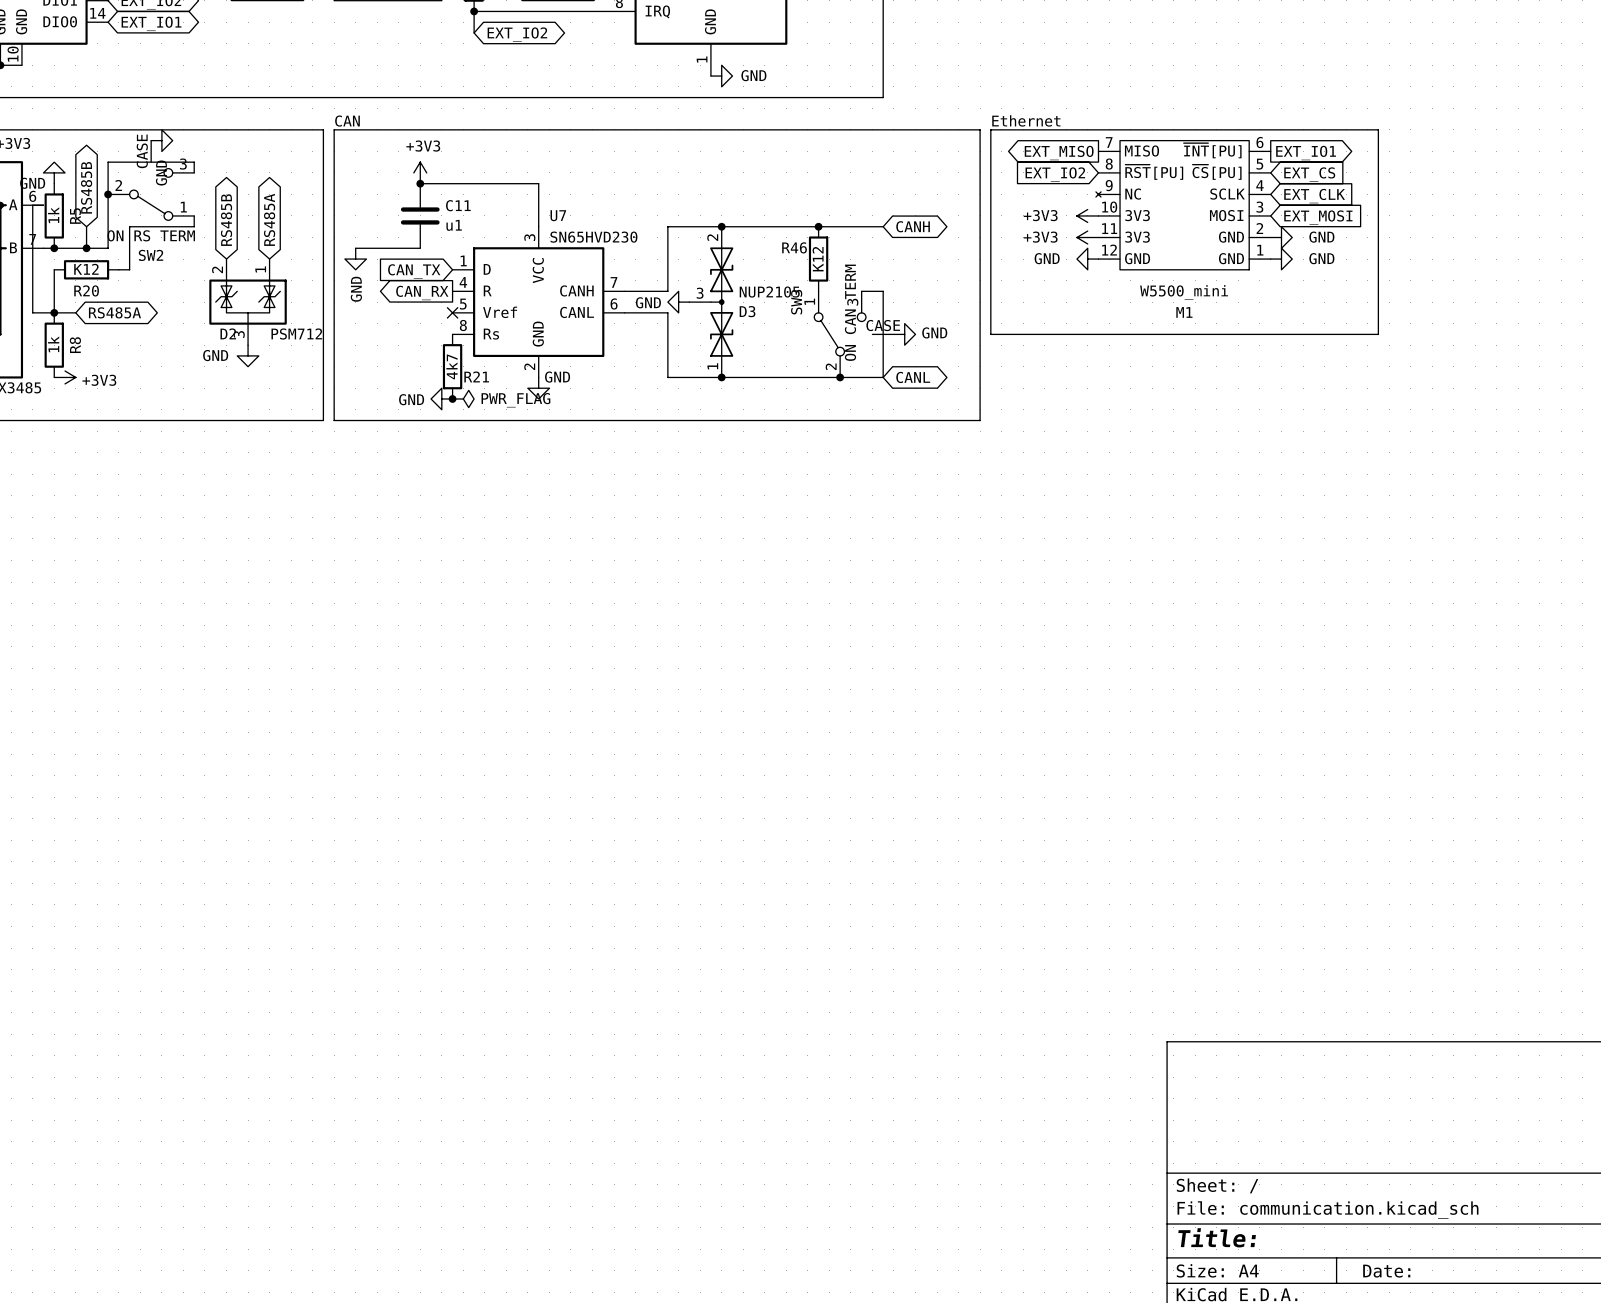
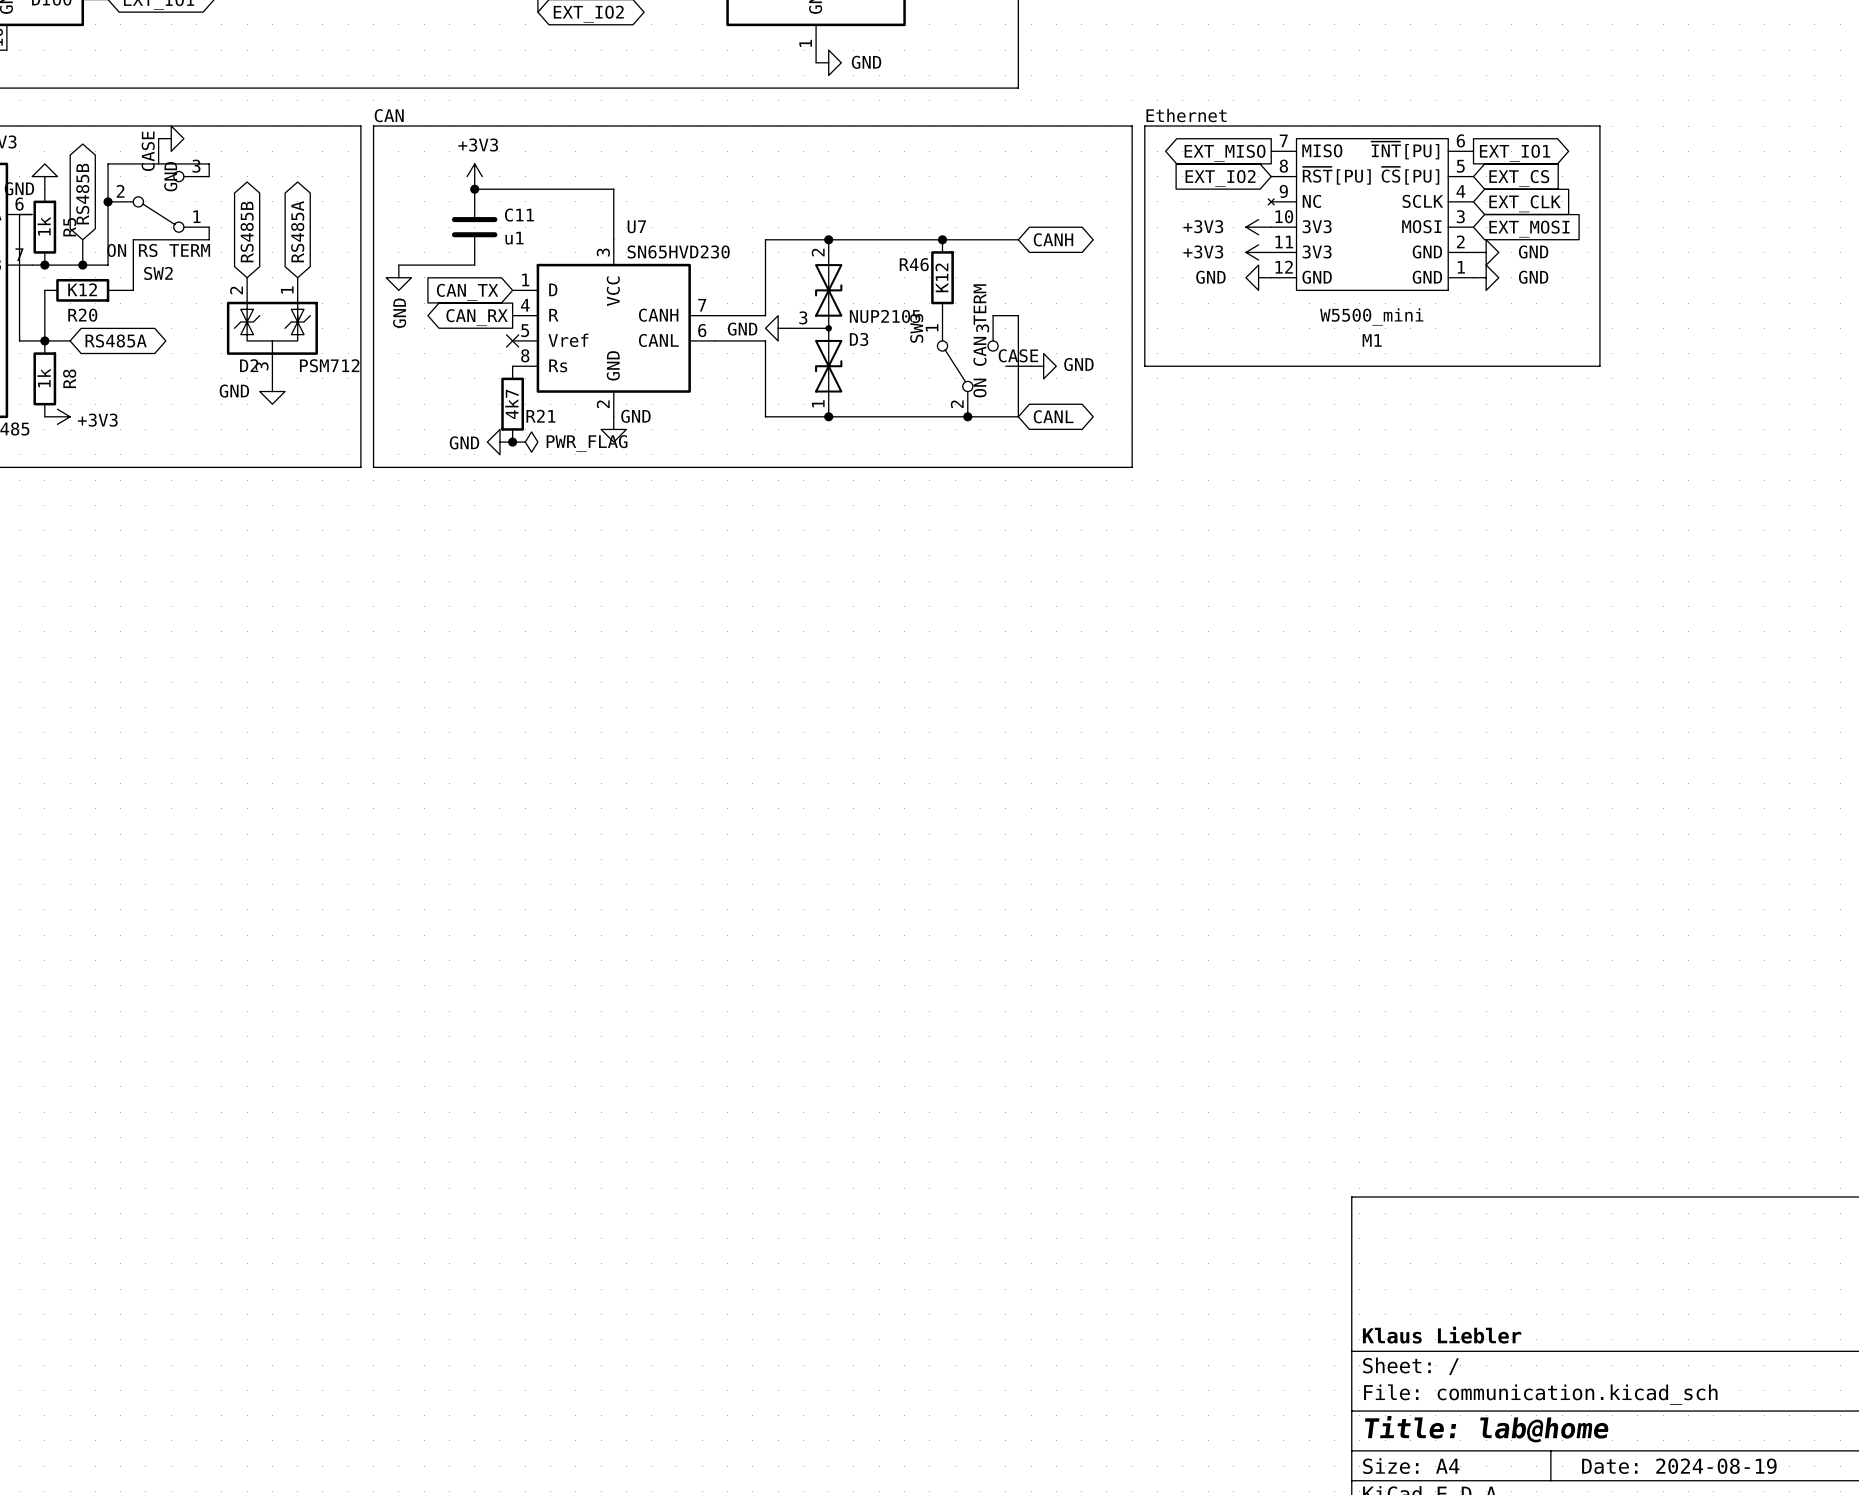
title block: none -> Klaus Liebler (1442, 1335)
title block: Title: (1217, 1237) -> Title: lab@home (1486, 1429)
title block: Date: (1386, 1271) -> Date: 2024-08-19 (1679, 1466)

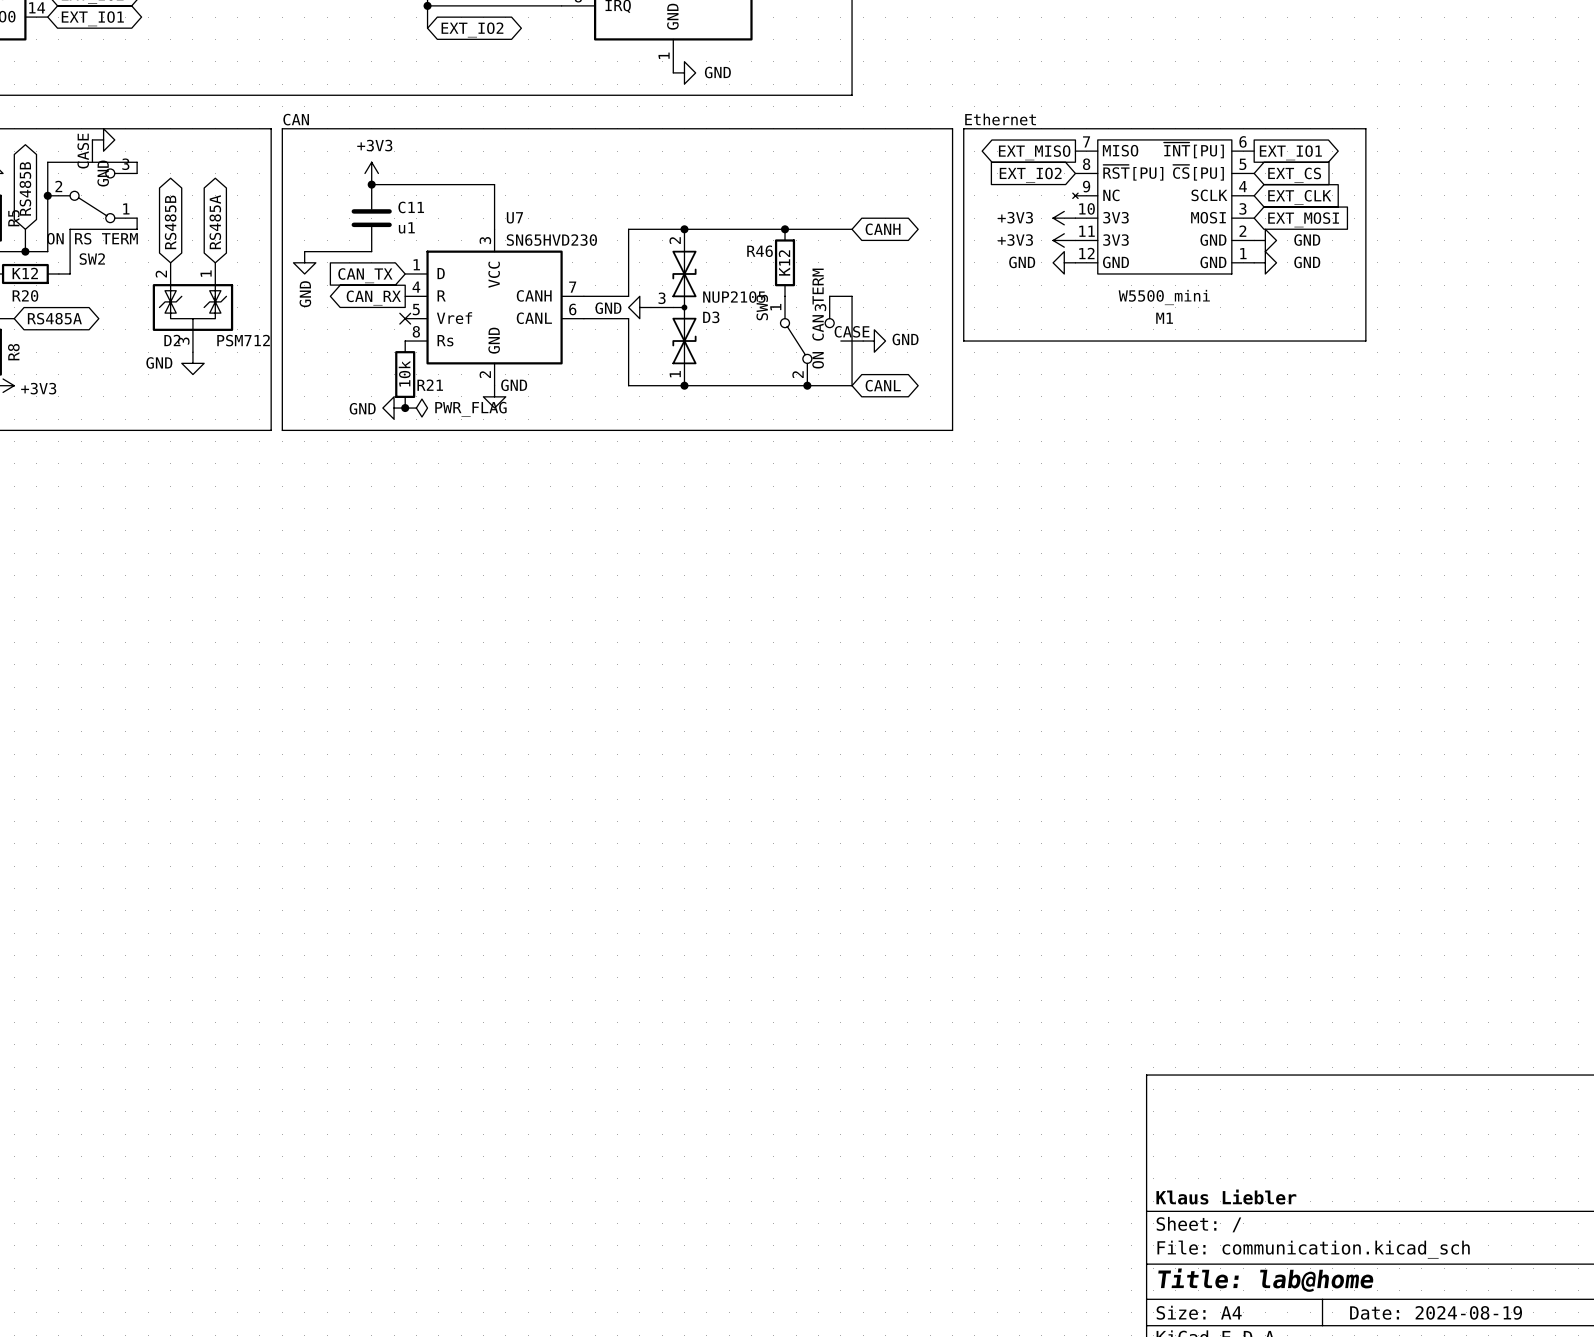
R21 value: 4k7 (511, 404) -> 10k (404, 373)

